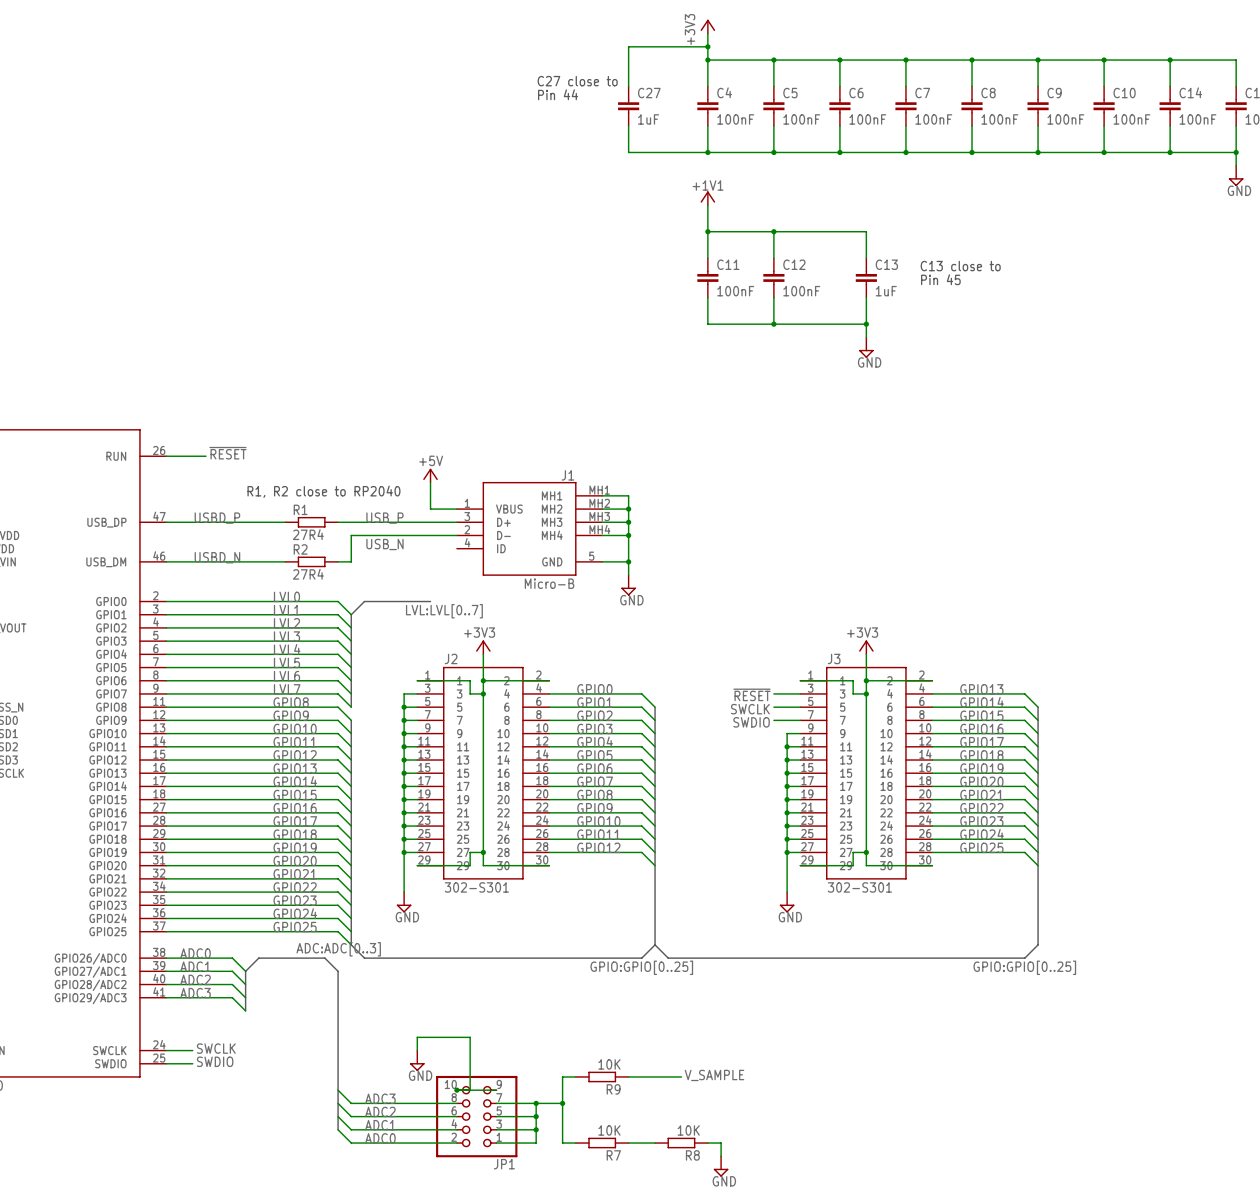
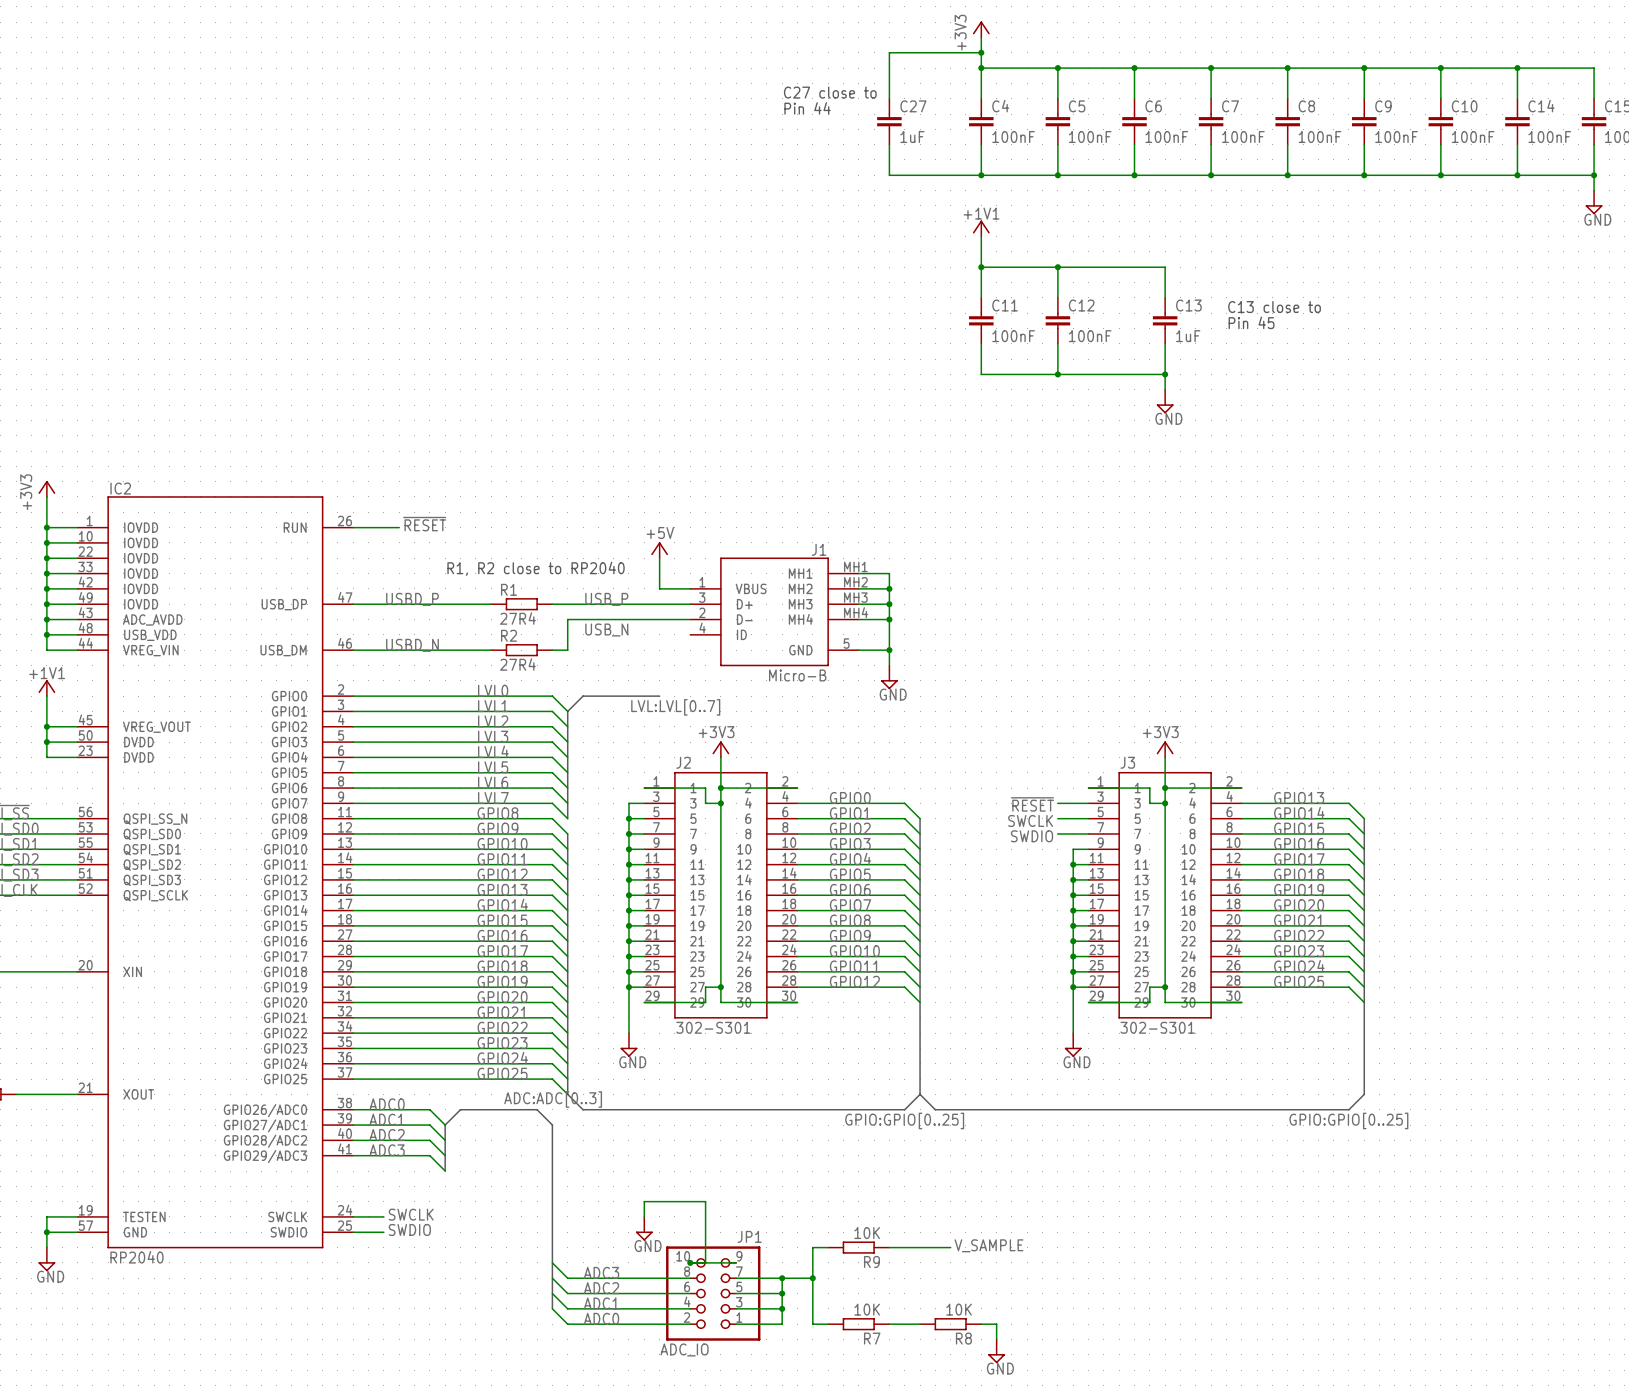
JP1 name position: JP1 (504, 1164) -> JP1 (749, 1236)
JP1 value: none -> ADC_IO (684, 1349)

